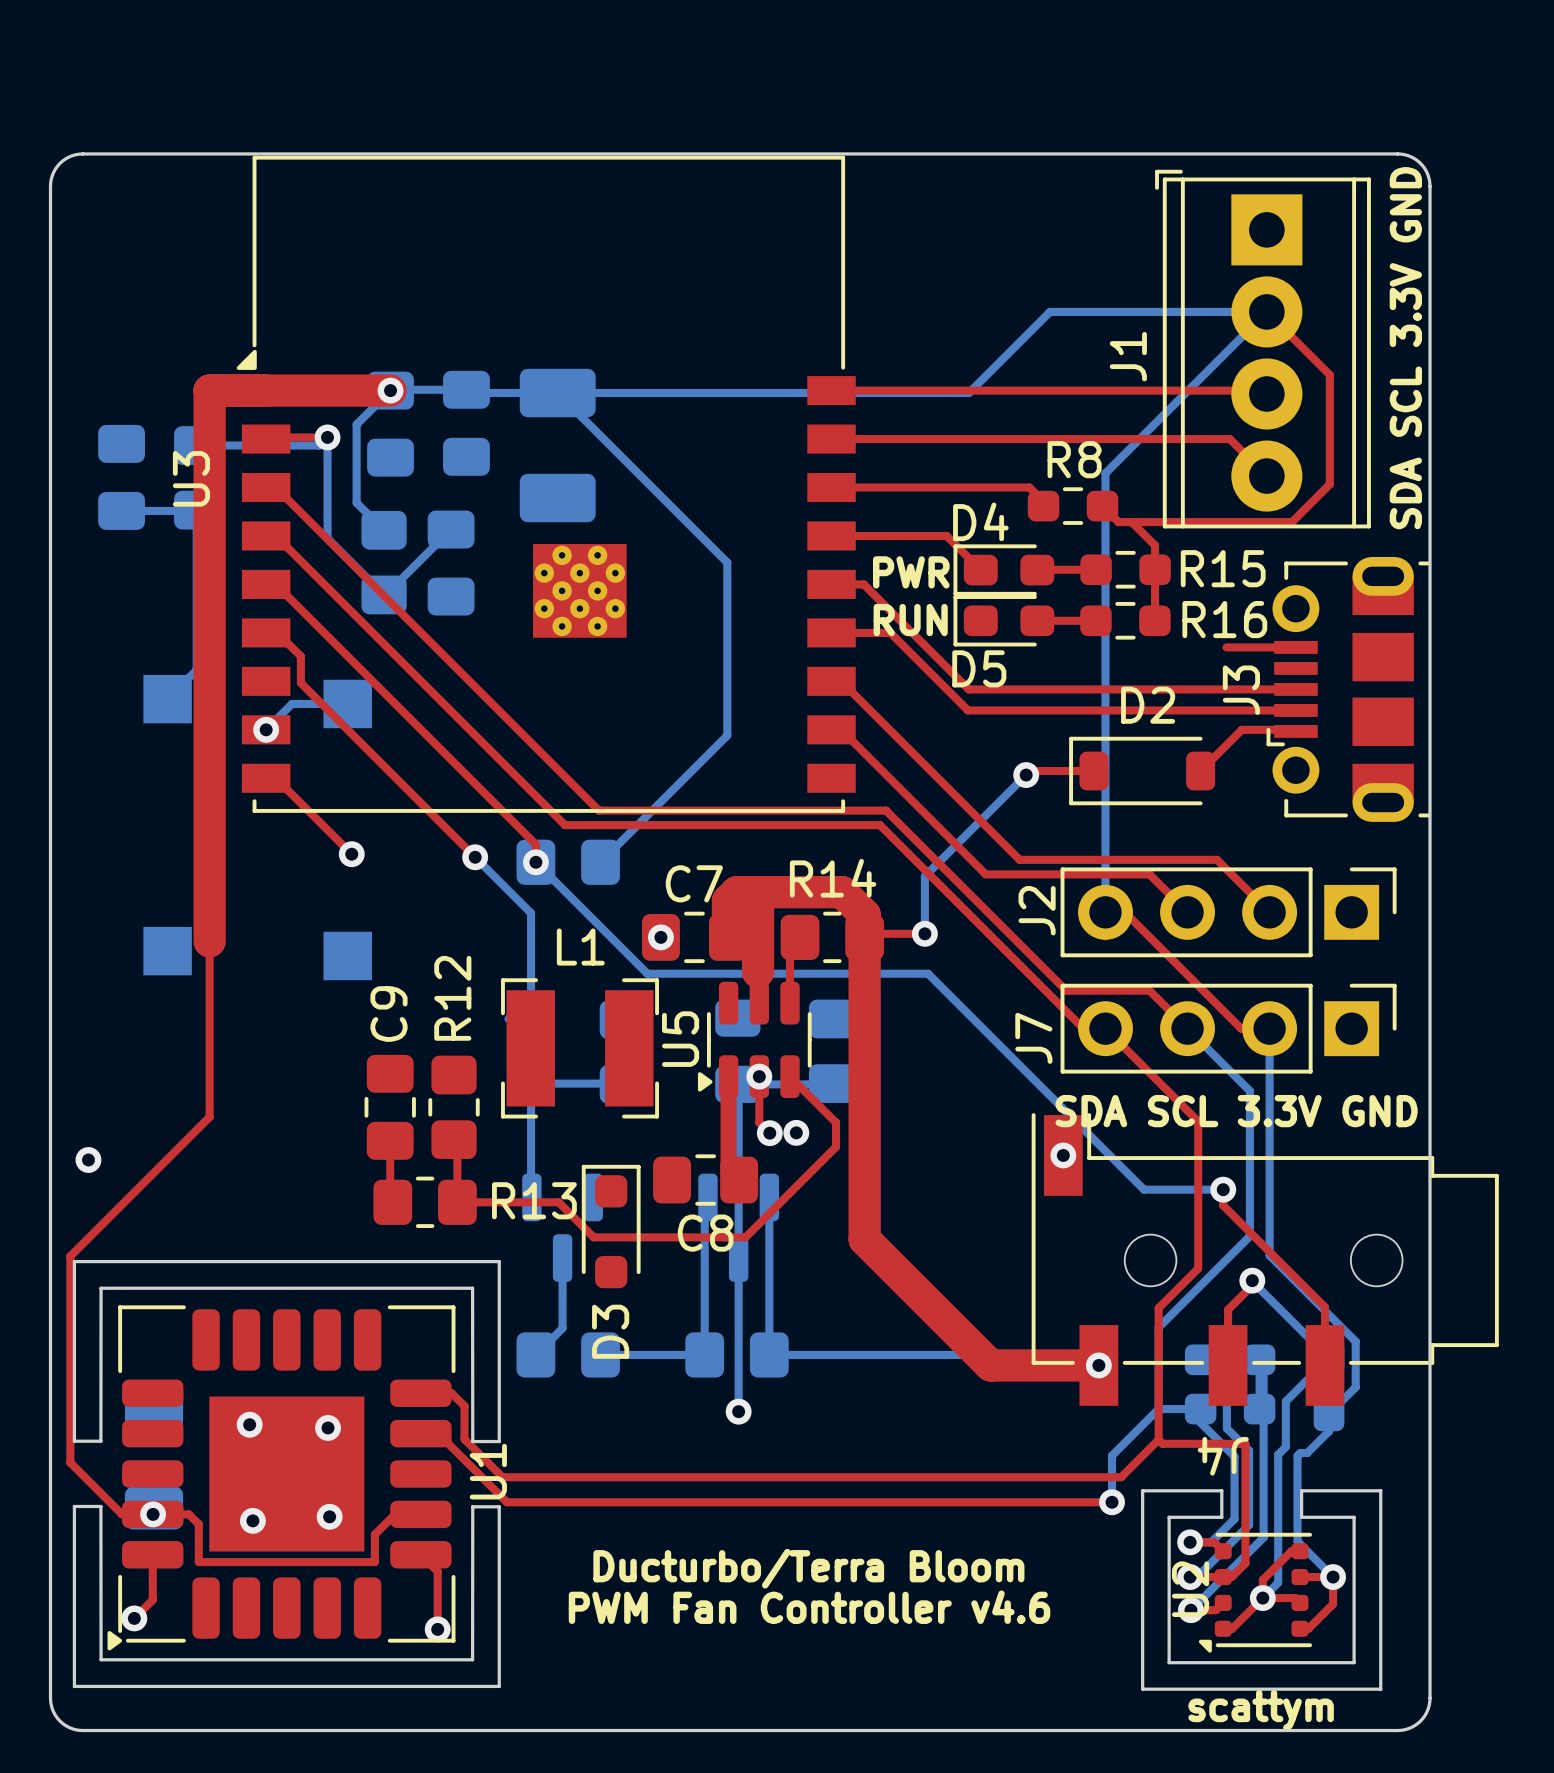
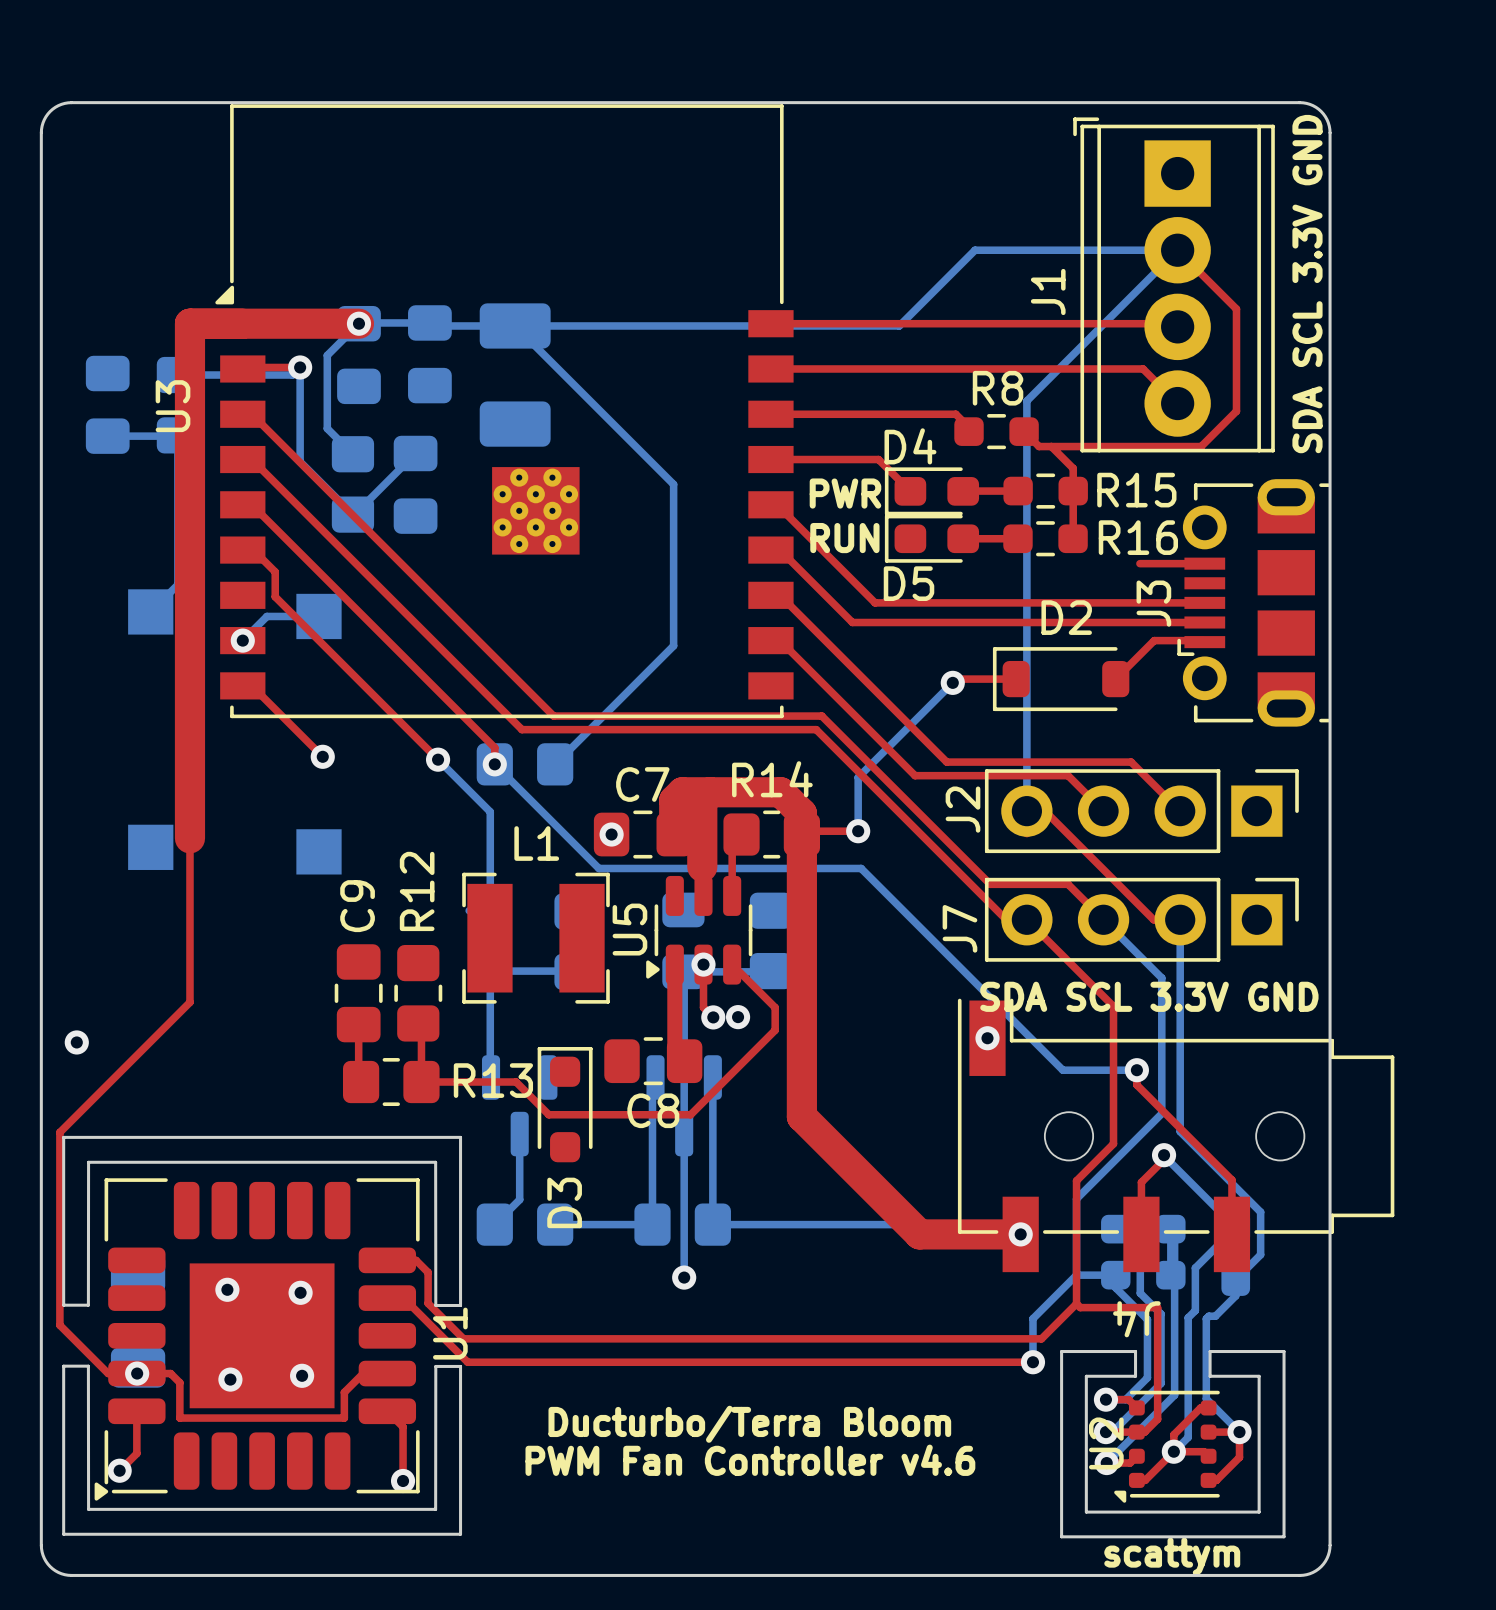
top track: (837, 584) (863, 584) (968, 689) -> (776, 504) (875, 602) (899, 602)
top track: (841, 632) (890, 632) (967, 710) -> (780, 550) (852, 622) (898, 622)

